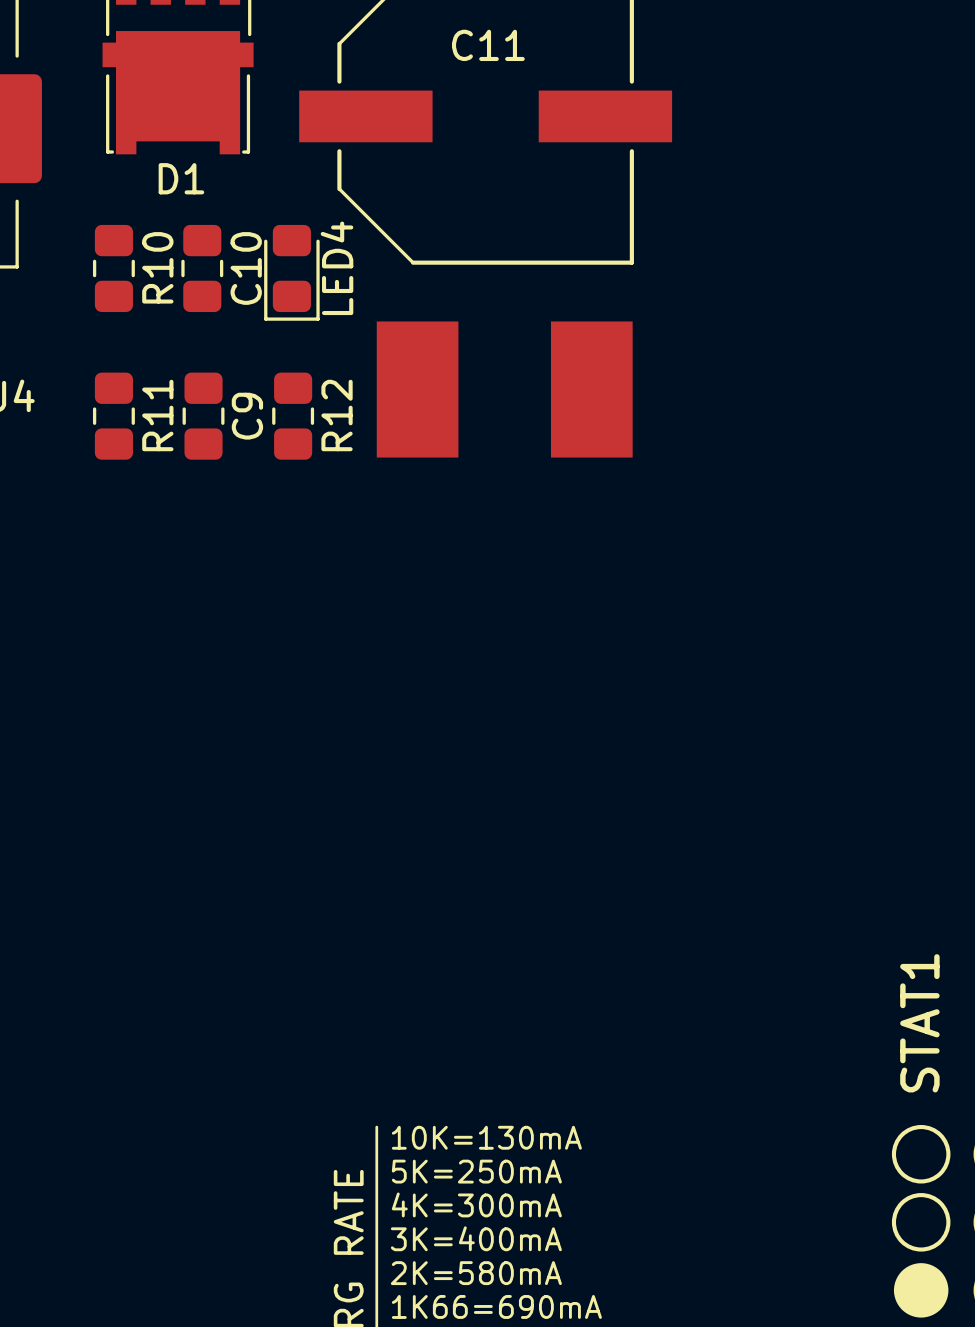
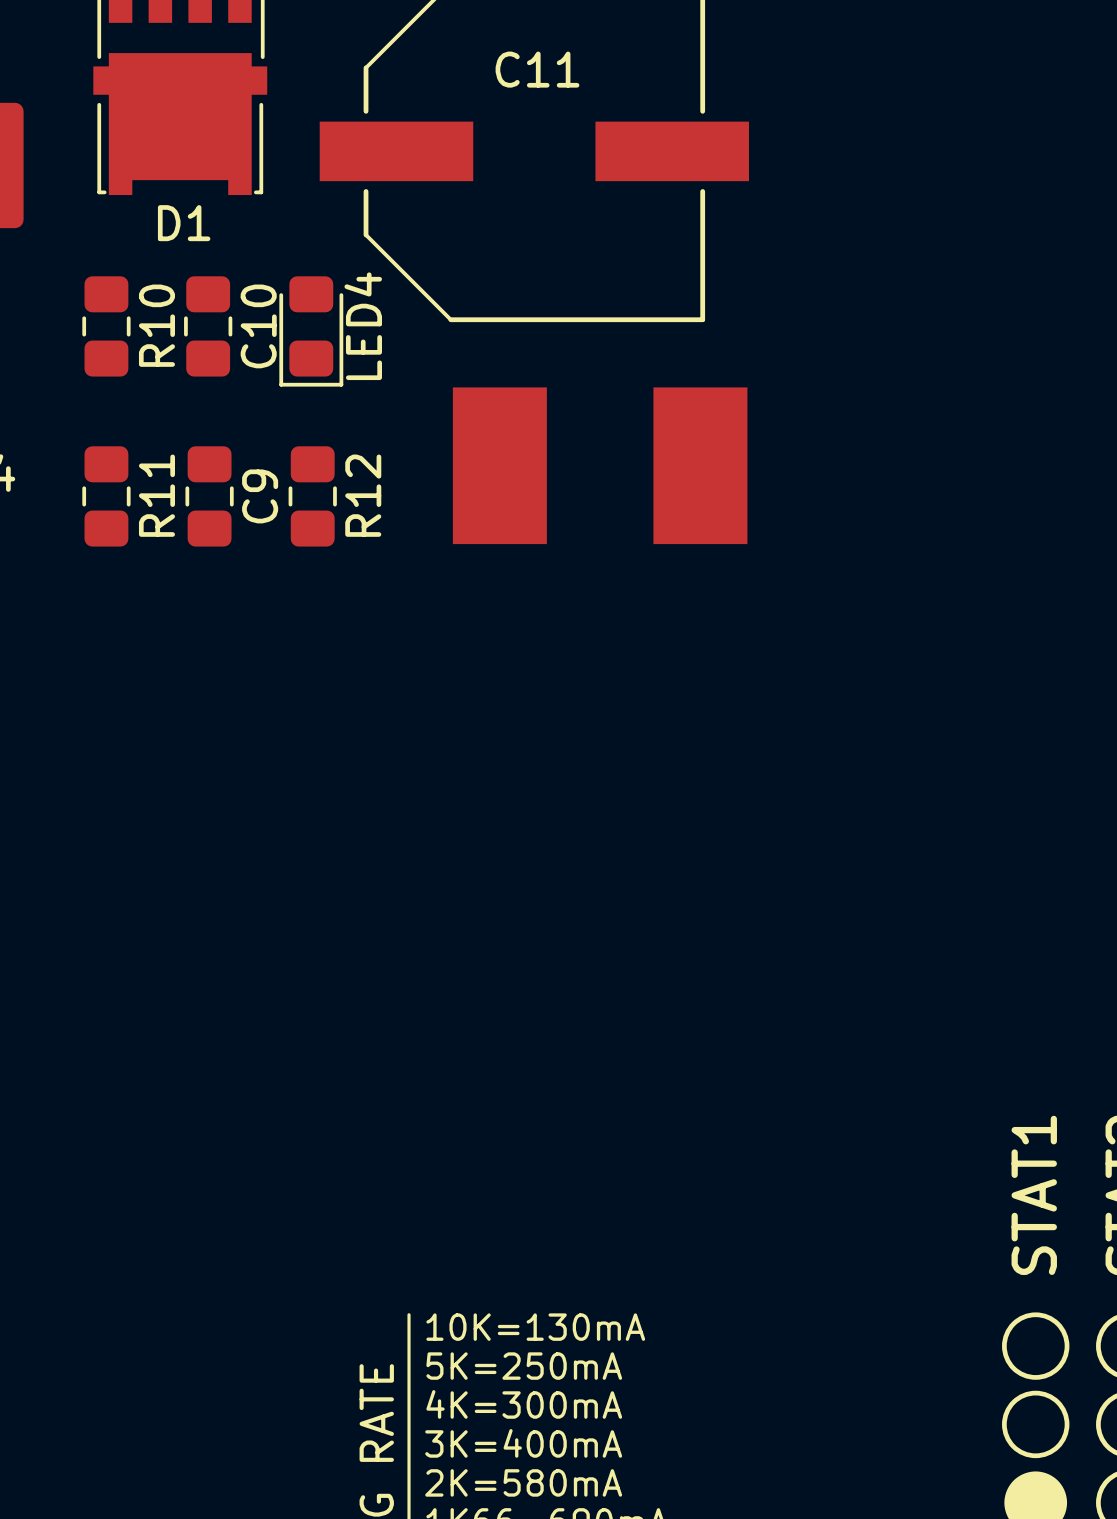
part position: (417, 389) -> (499, 465)
part position: (591, 389) -> (700, 465)

